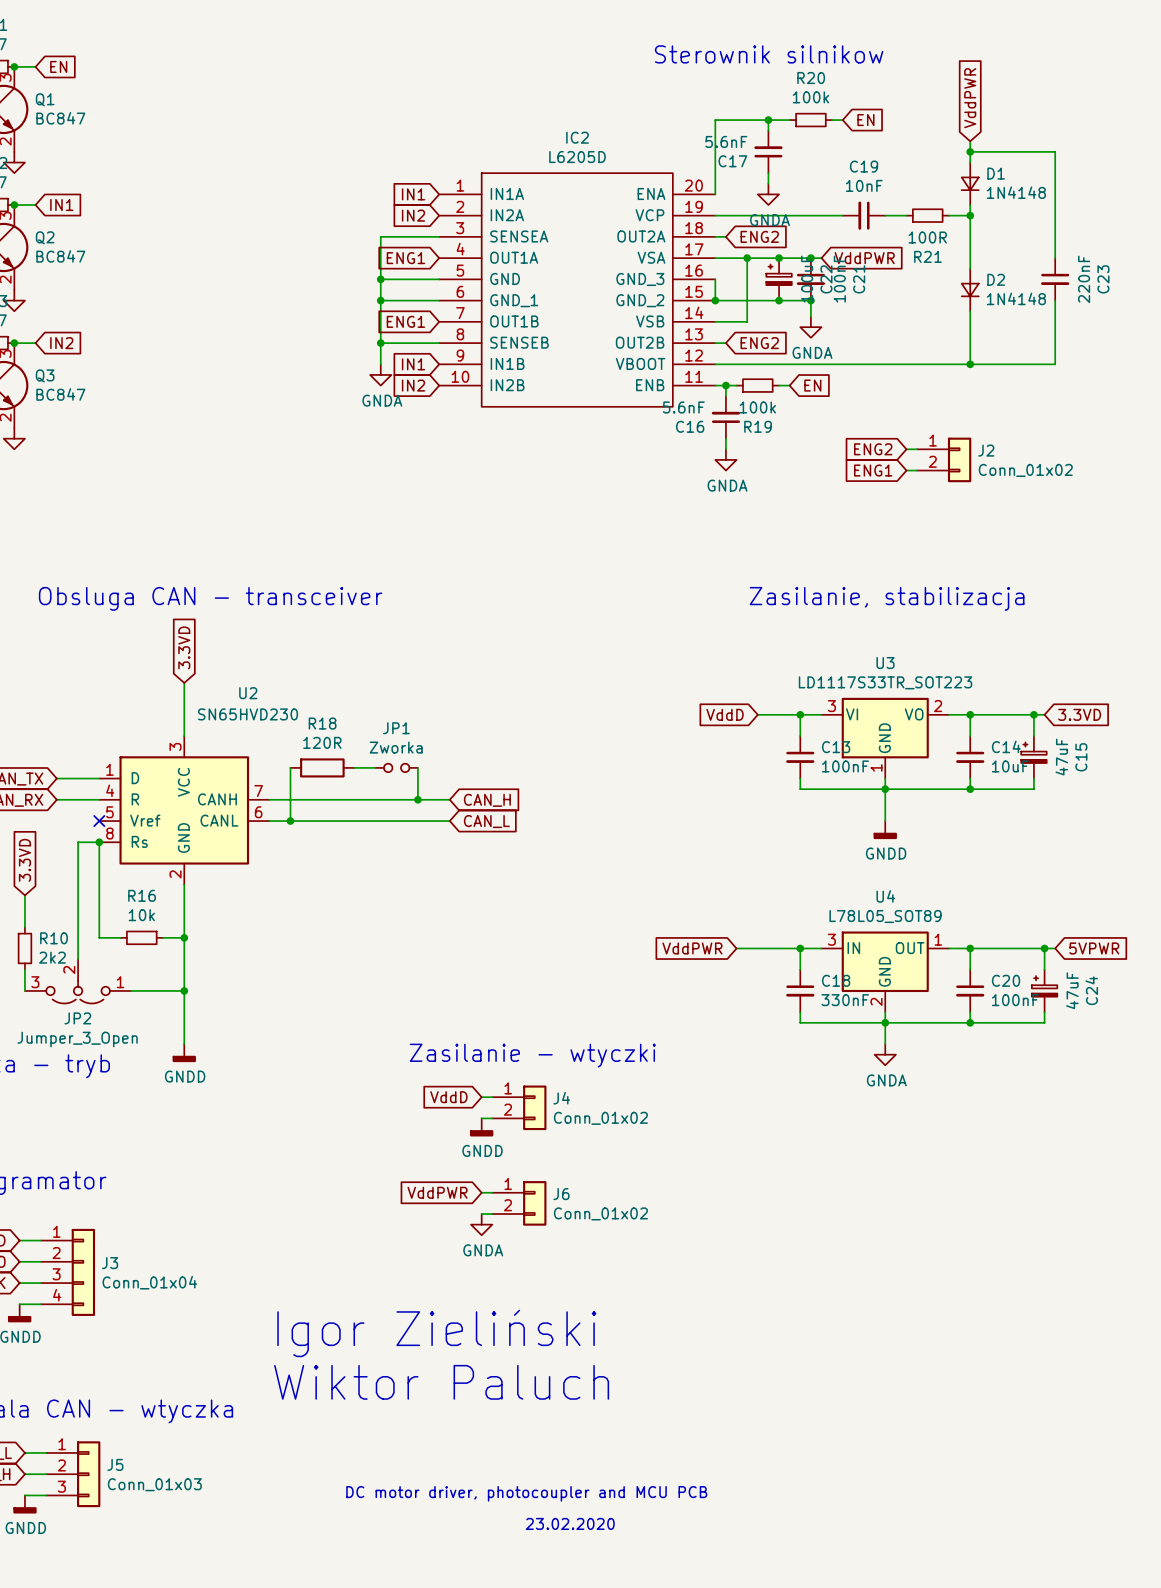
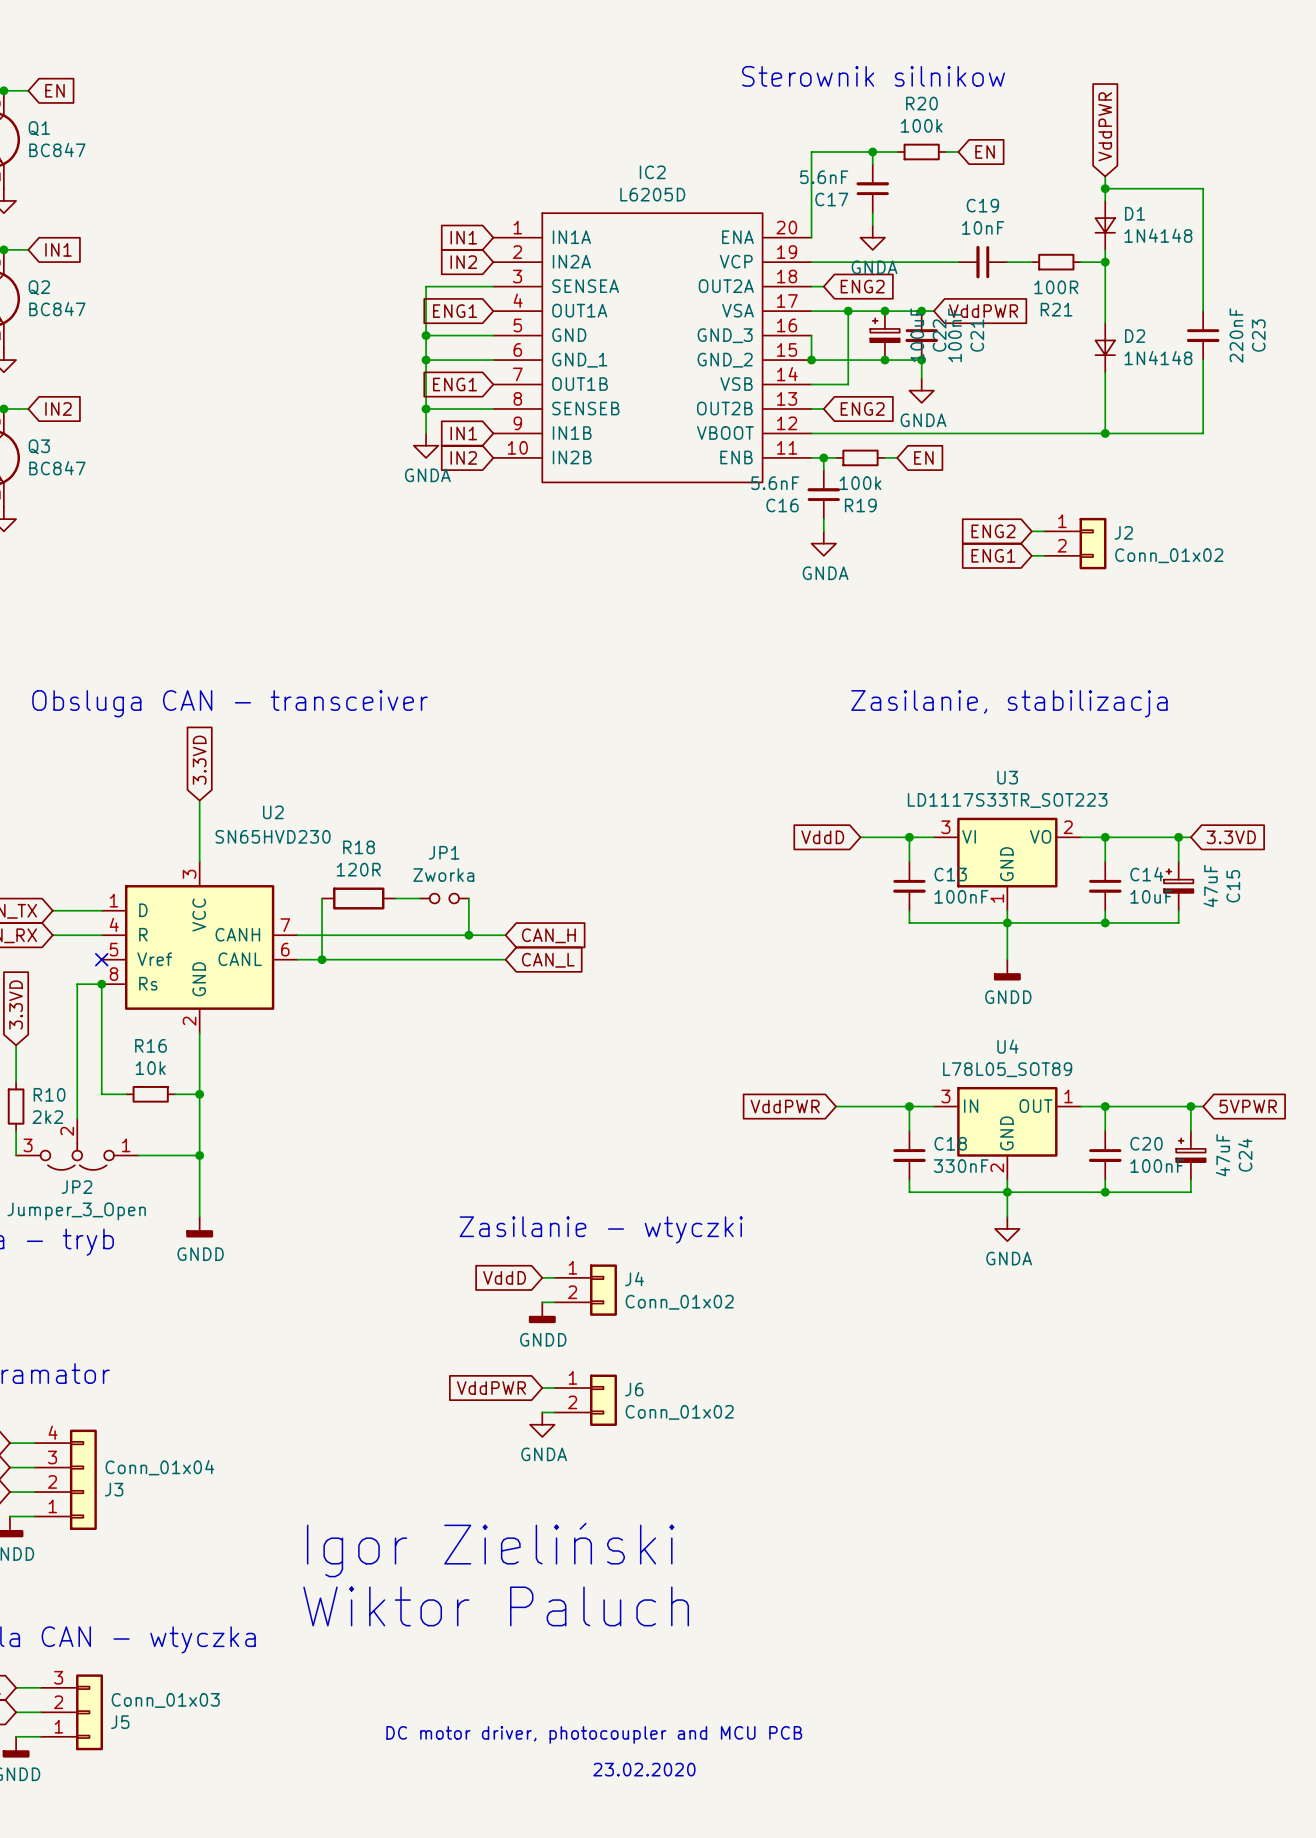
J3 flip: as is (83, 1272) -> up-down (83, 1479)
J5 flip: as is (88, 1474) -> up-down (89, 1712)

